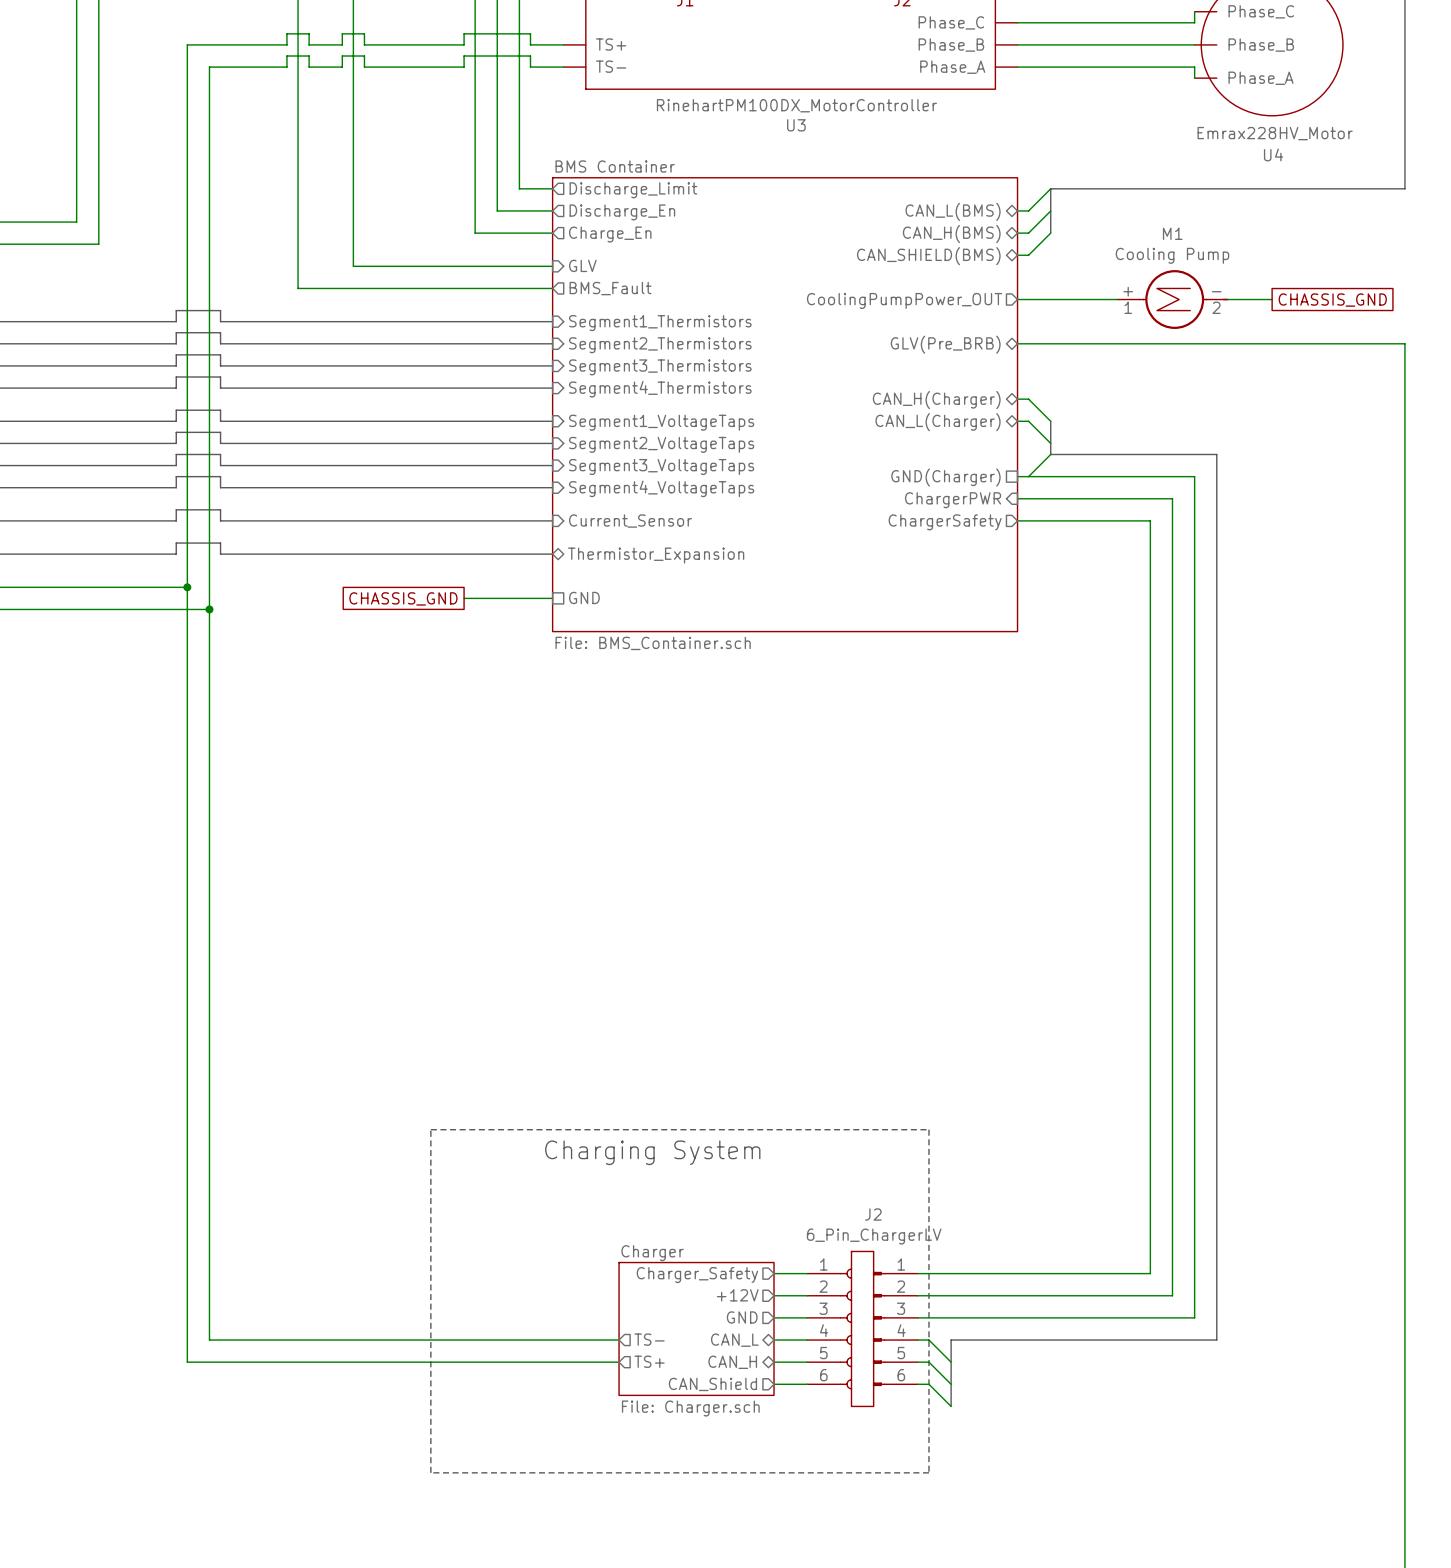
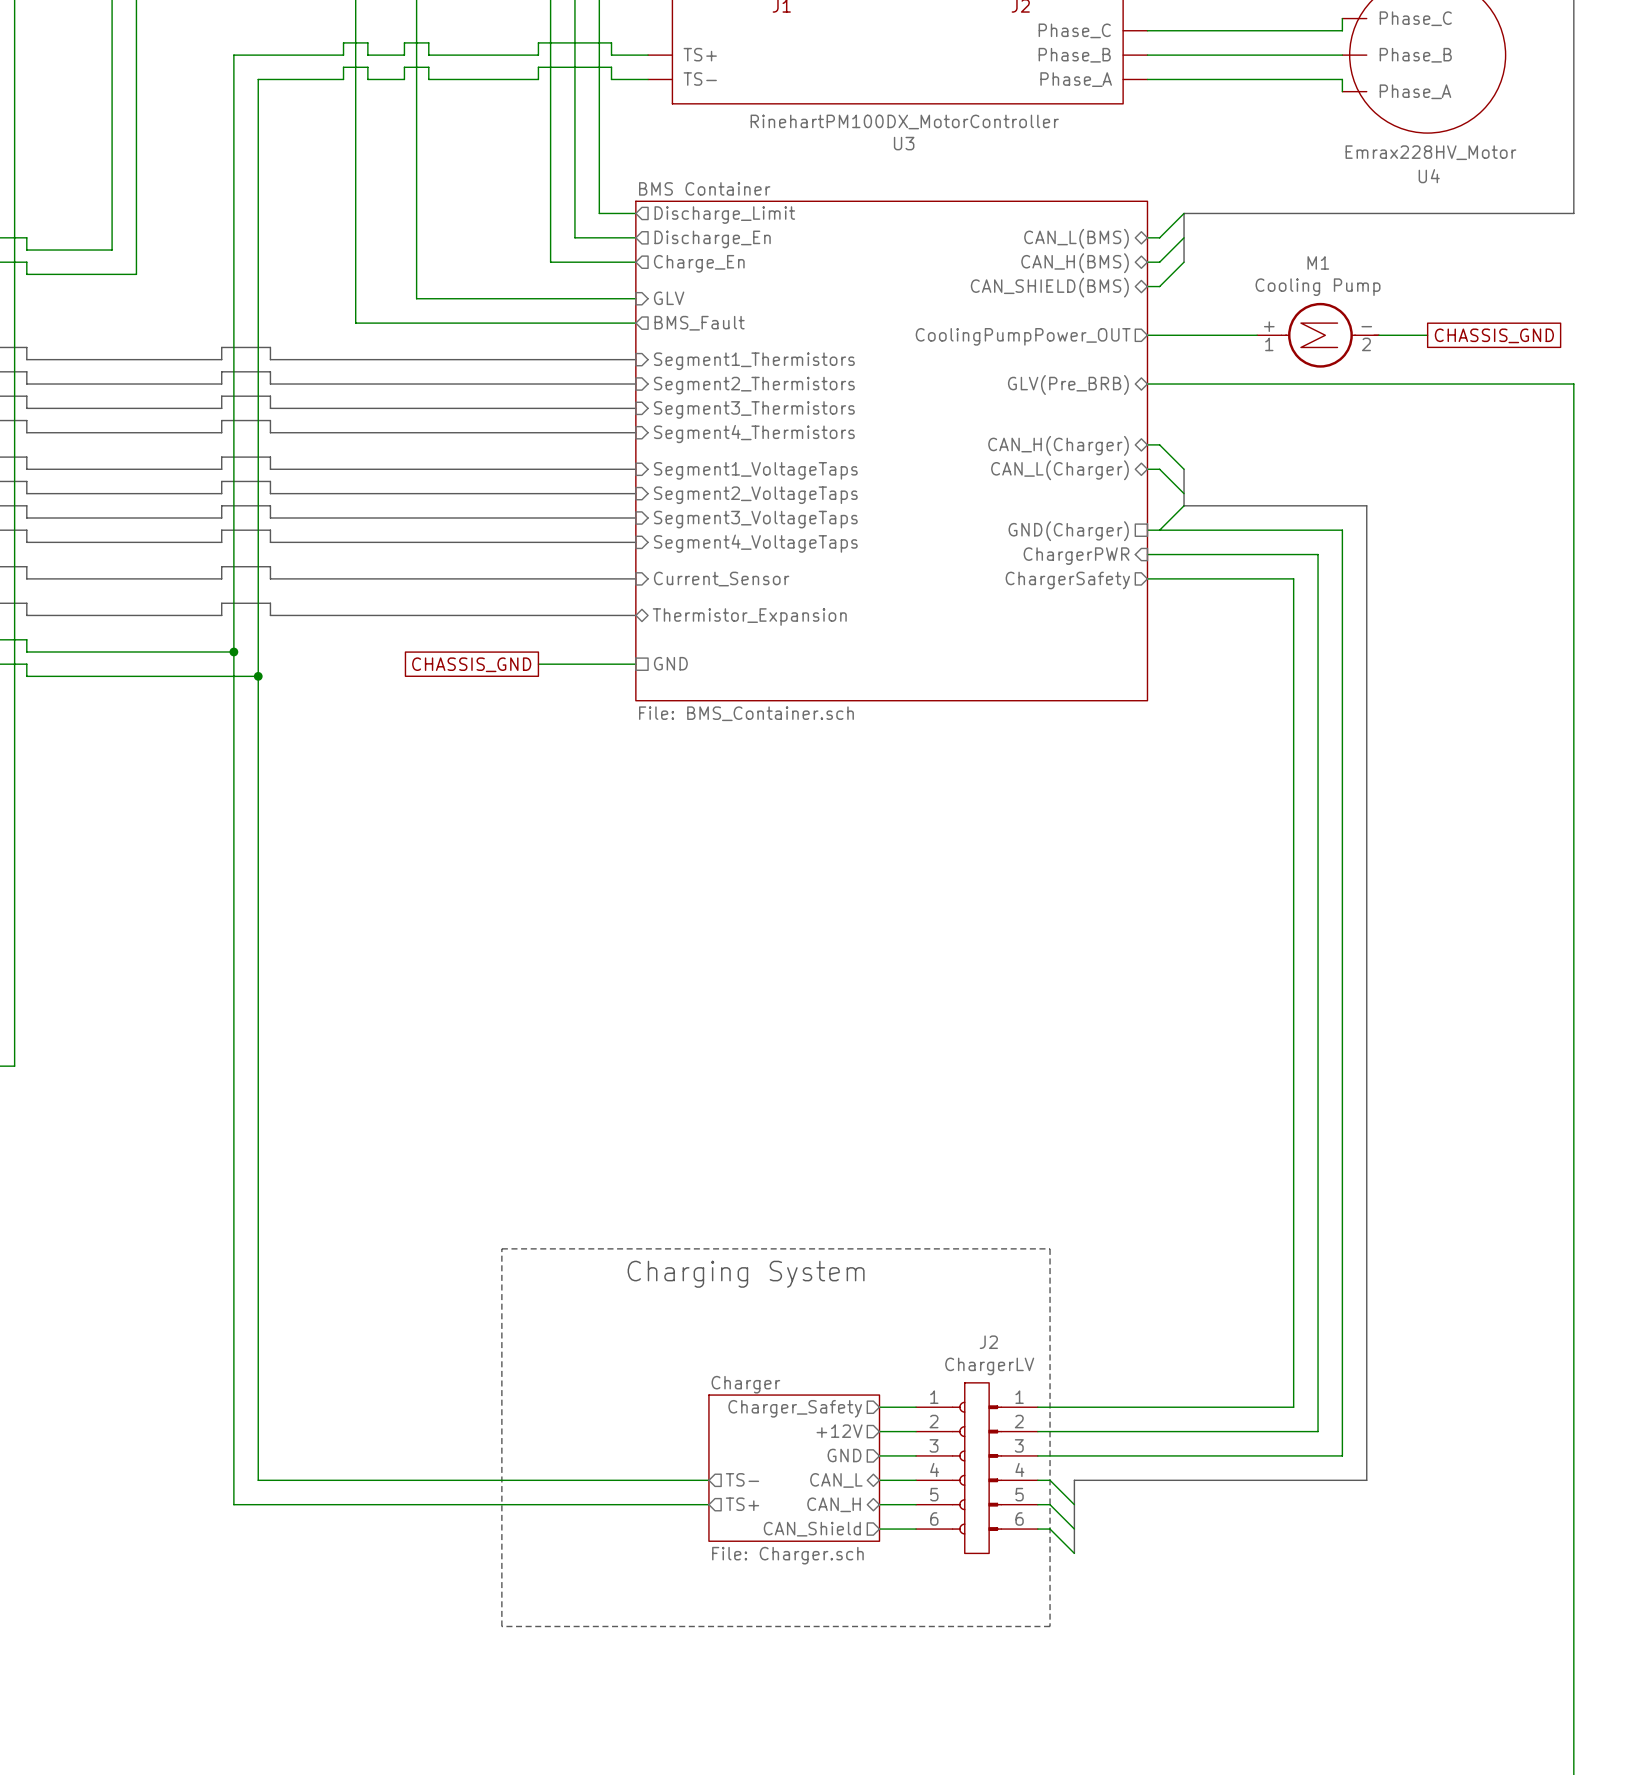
J2 value: 6_Pin_ChargerLV (874, 1236) -> ChargerLV (989, 1366)

